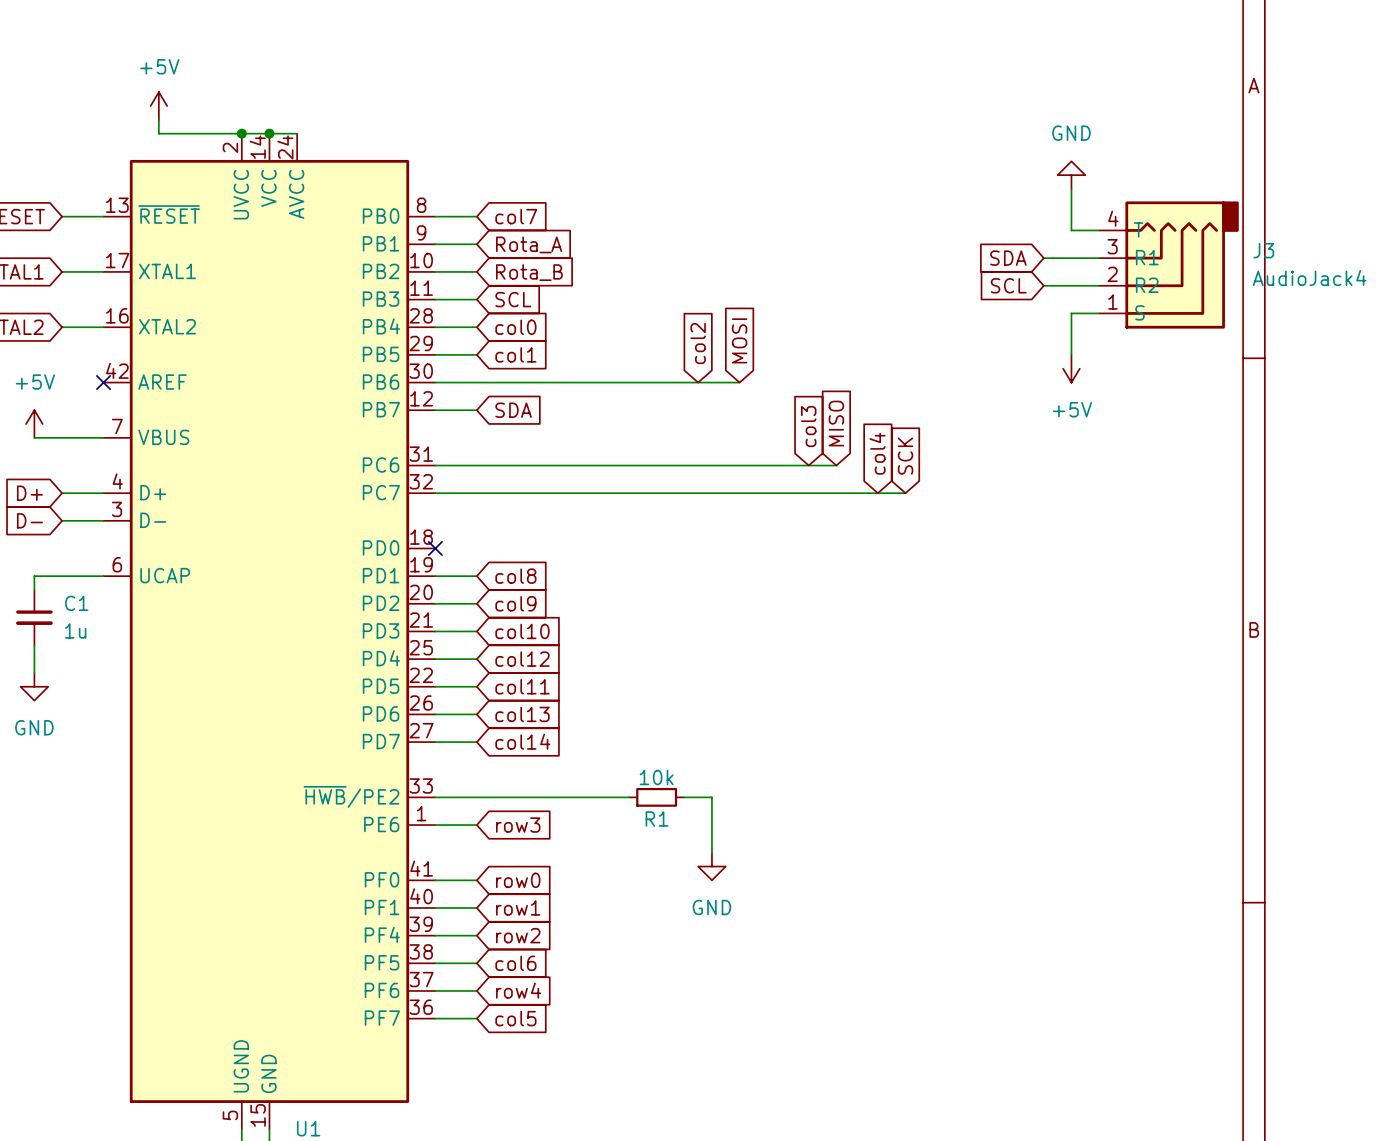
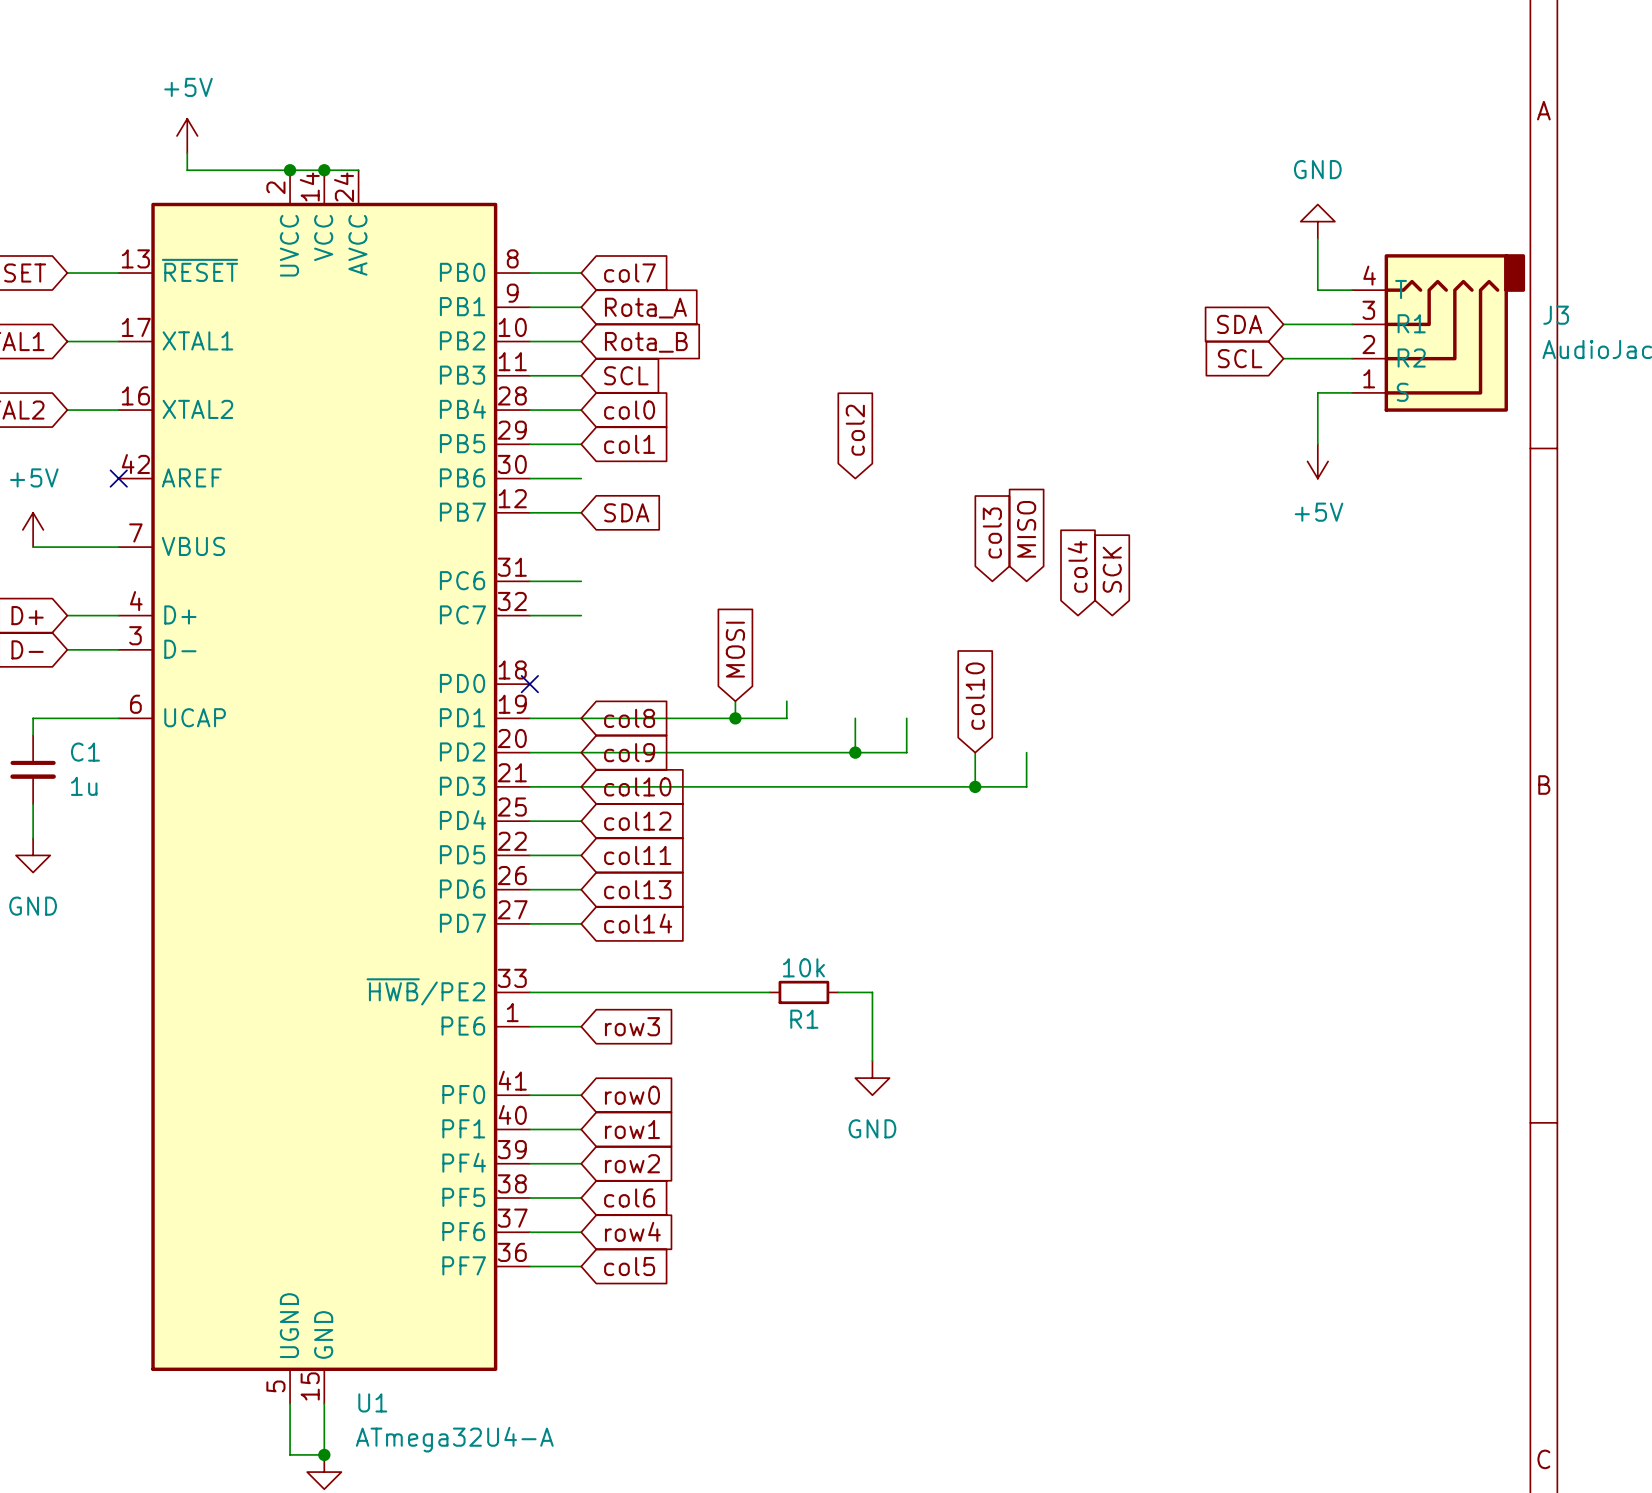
global label position: MOSI (739, 340) -> MOSI (735, 649)
wire: (476, 382) (739, 382) -> none
wire: (476, 465) (836, 465) -> none
wire: (476, 493) (905, 493) -> none
global label: none -> col10 (975, 696)
wire: none -> (735, 701) (735, 718)
wire: none -> (786, 701) (786, 718) (581, 718)
junction: none -> (735, 718)
wire: none -> (855, 718) (855, 752)
wire: none -> (906, 718) (906, 752) (581, 752)
junction: none -> (855, 752)
wire: none -> (975, 752) (975, 786)
wire: none -> (1026, 752) (1026, 786) (581, 786)
junction: none -> (975, 786)

